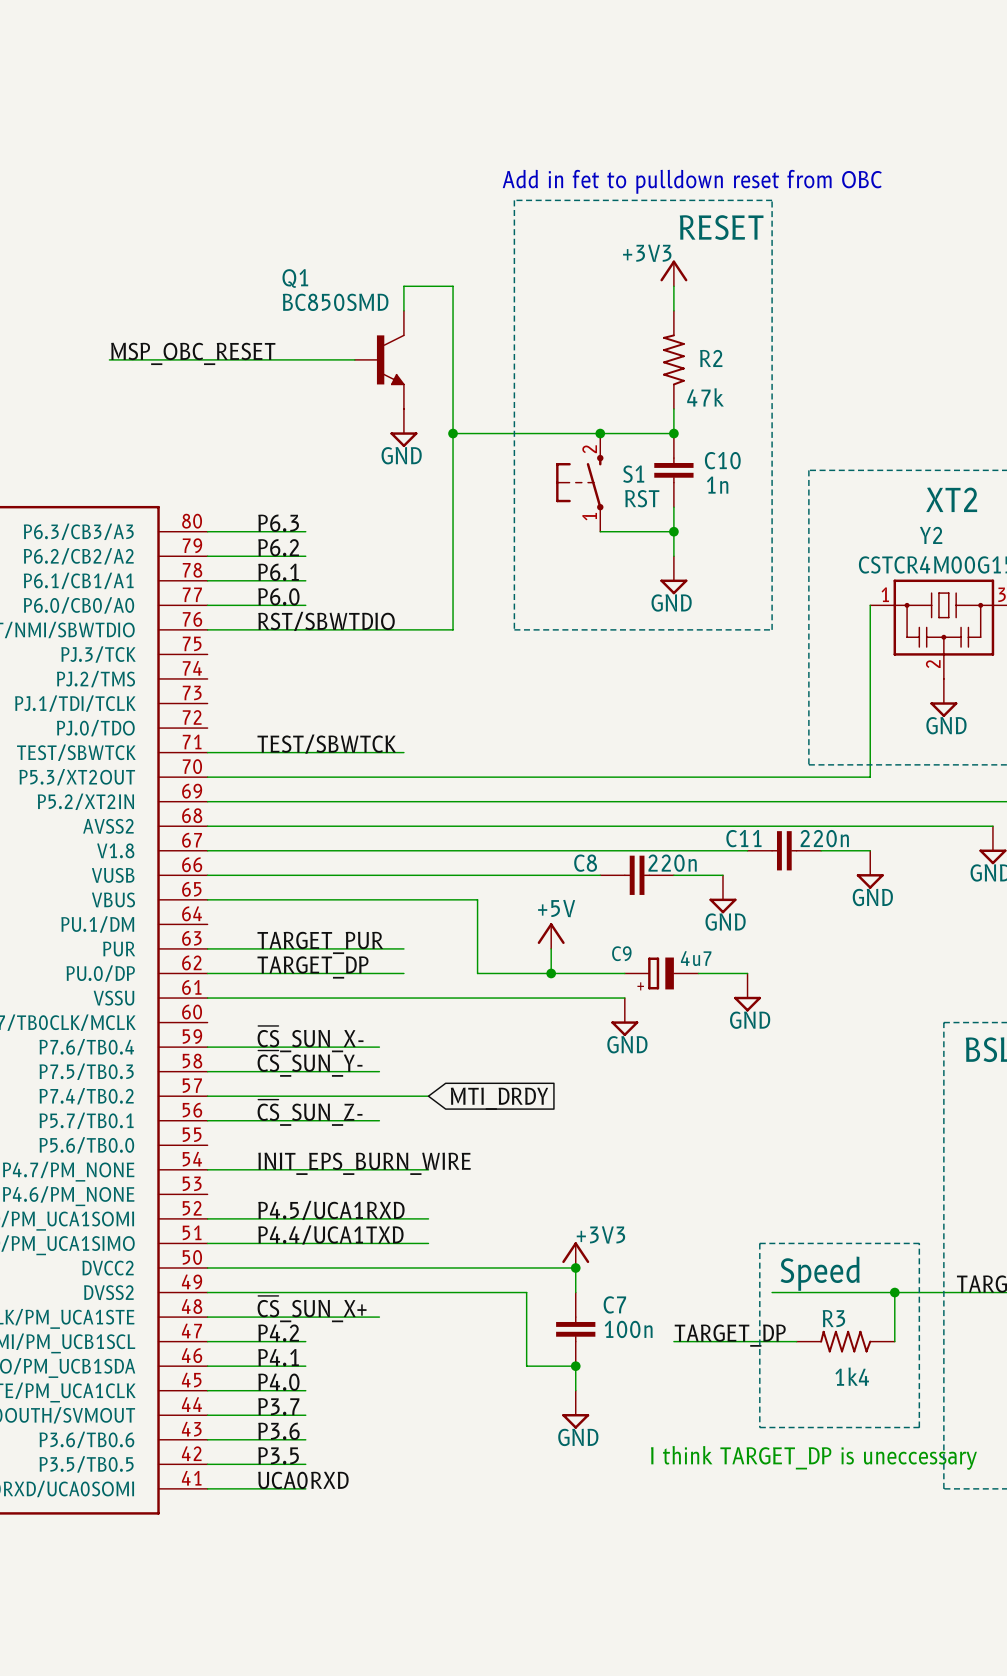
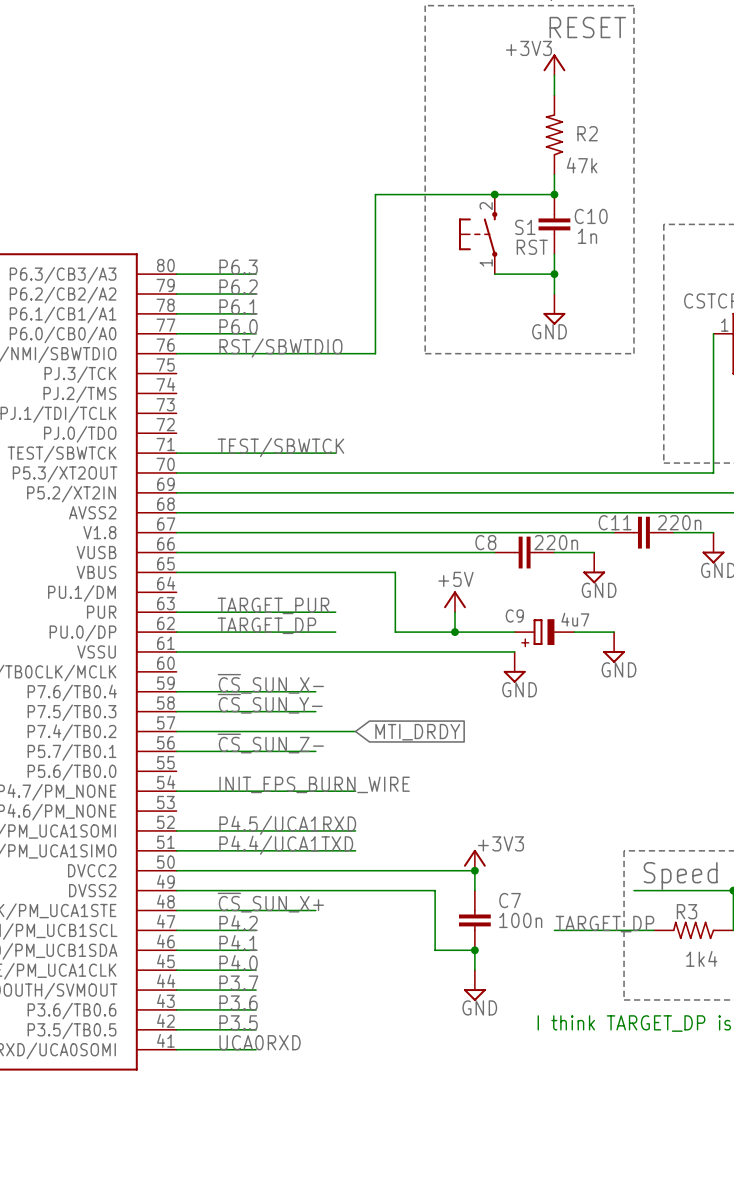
wire: (403, 310) (403, 286) (453, 286) (453, 433) -> none
label: MSP_OBC_RESET (193, 353) -> none
wire: (109, 359) (354, 359) -> none
Q1: BC850SMD (379, 359) -> none
power symbol: GND (403, 428) -> none
junction: (453, 433) -> none

